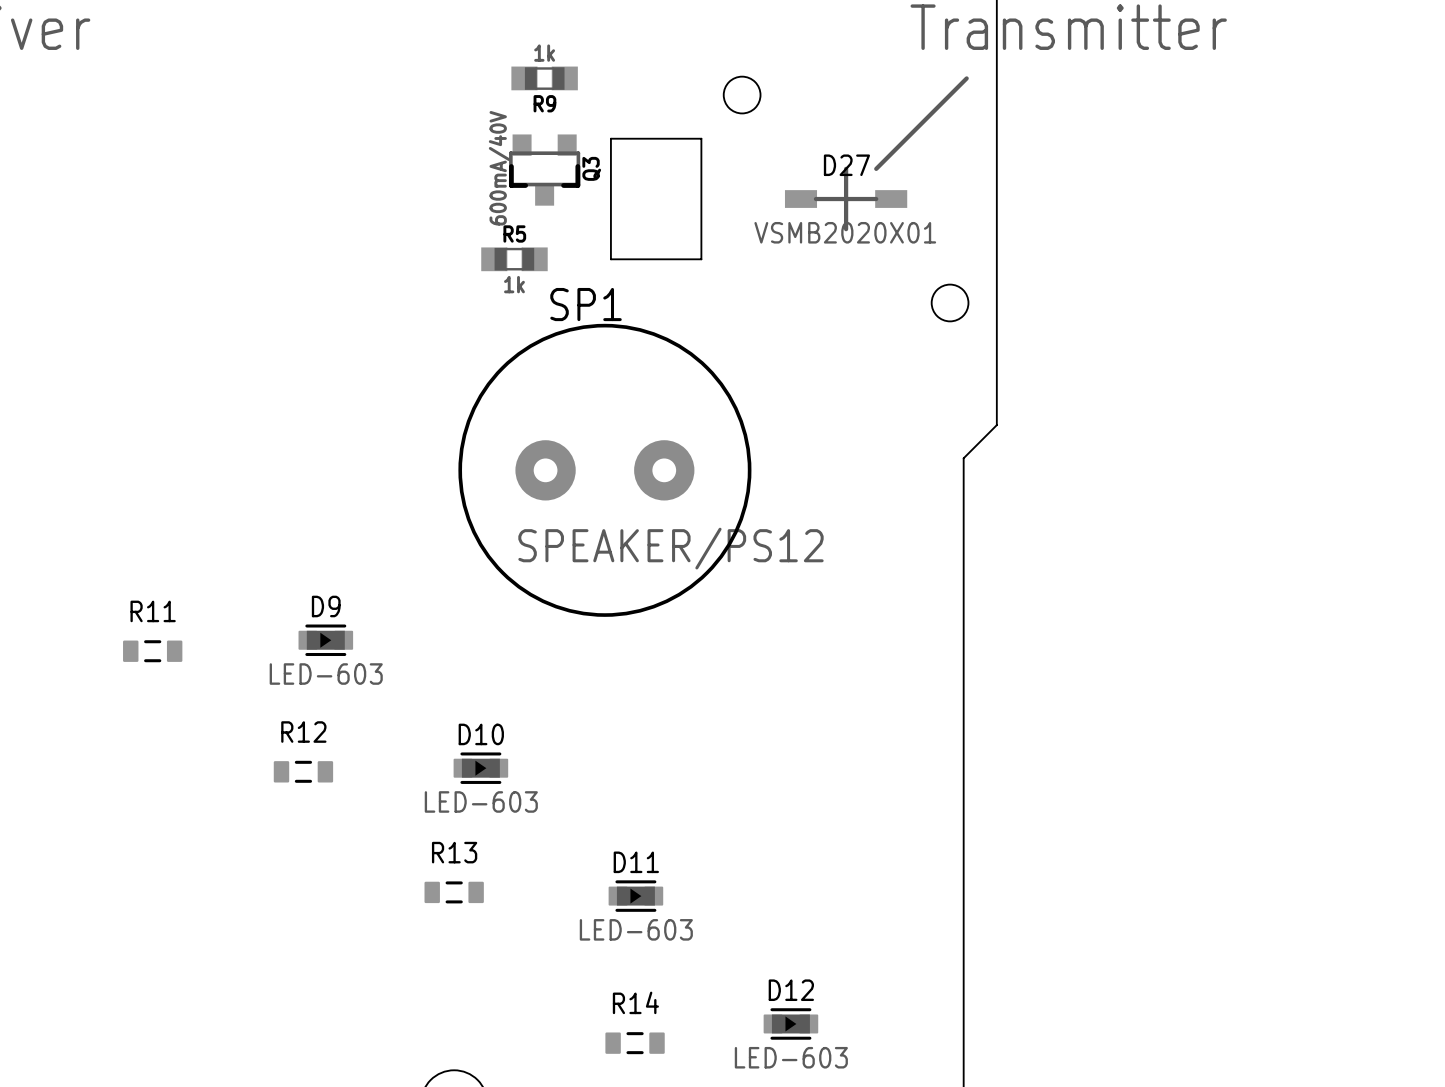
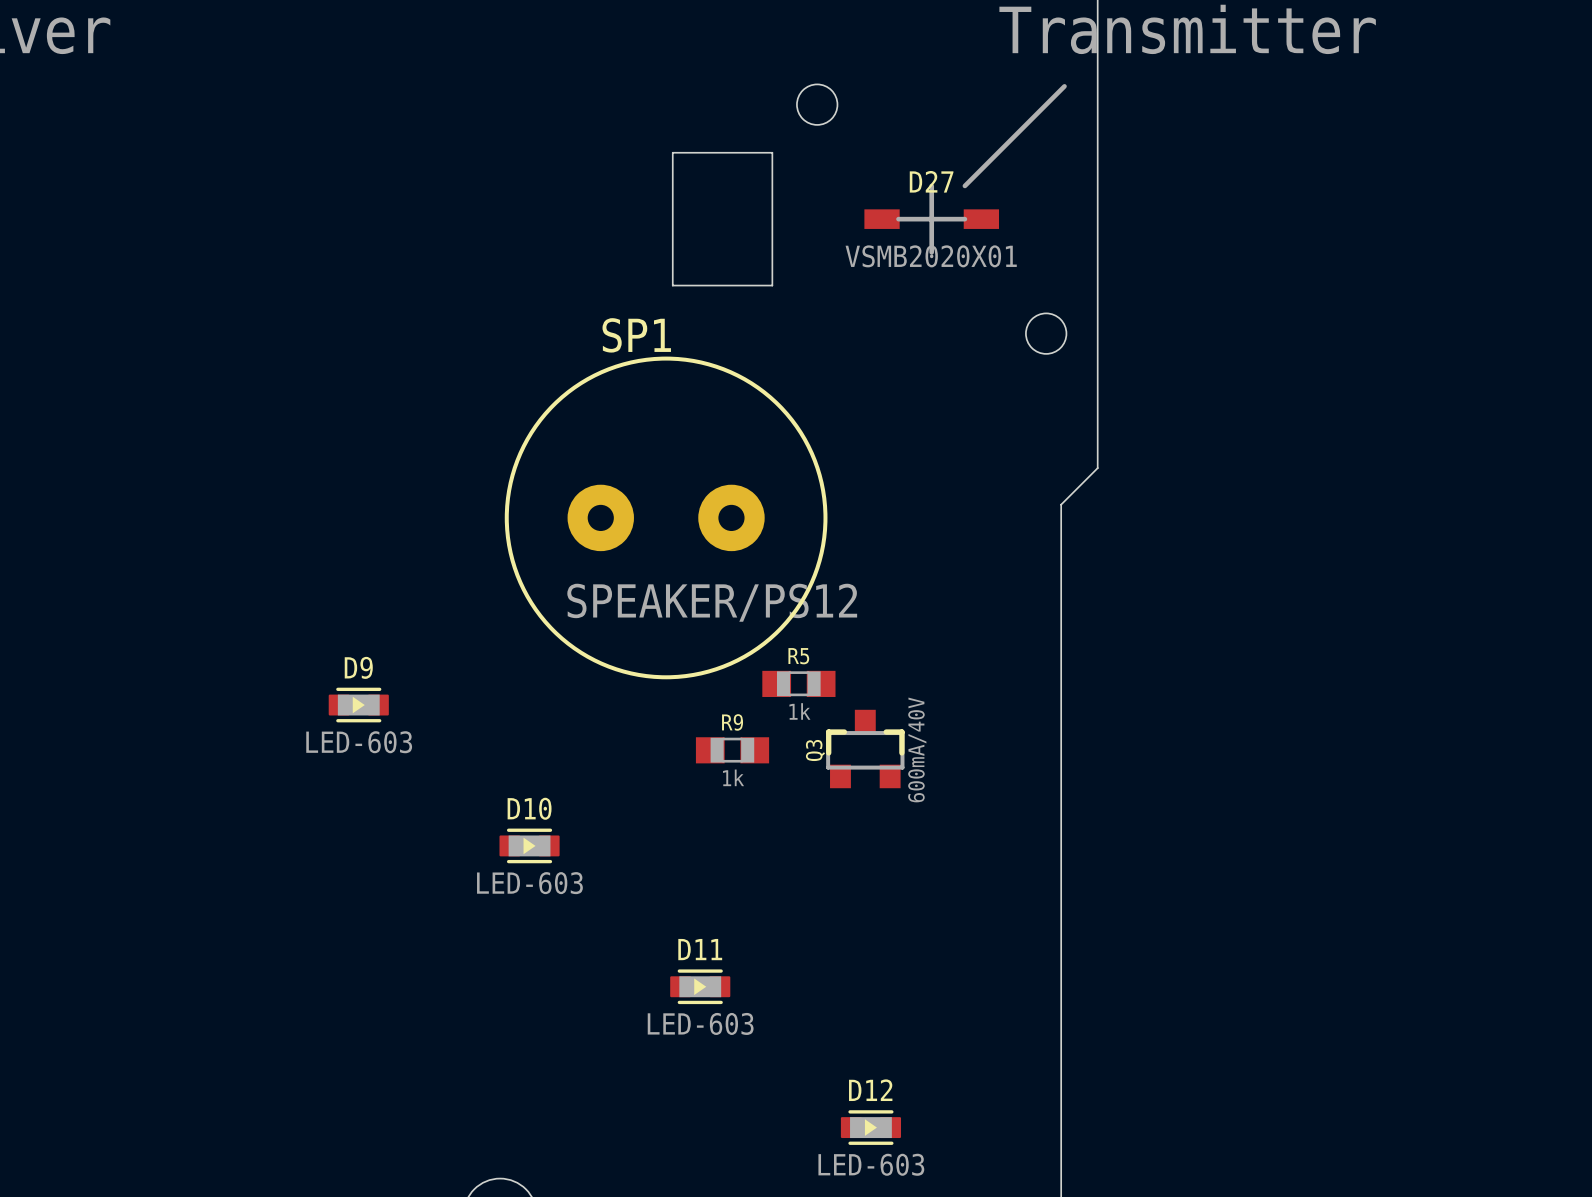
R9 value position: 1k (544, 53) -> 1k (733, 777)
R9 position: (544, 78) -> (732, 750)
R9 name position: R9 (544, 103) -> R9 (732, 722)
Q3 rotation: 0° (544, 170) -> 180° (865, 749)
Q3 position: (544, 170) -> (865, 749)
R5 position: (514, 259) -> (798, 683)
R11: (152, 651) -> none
R12: (303, 771) -> none
R13: (454, 892) -> none
R14: (635, 1043) -> none

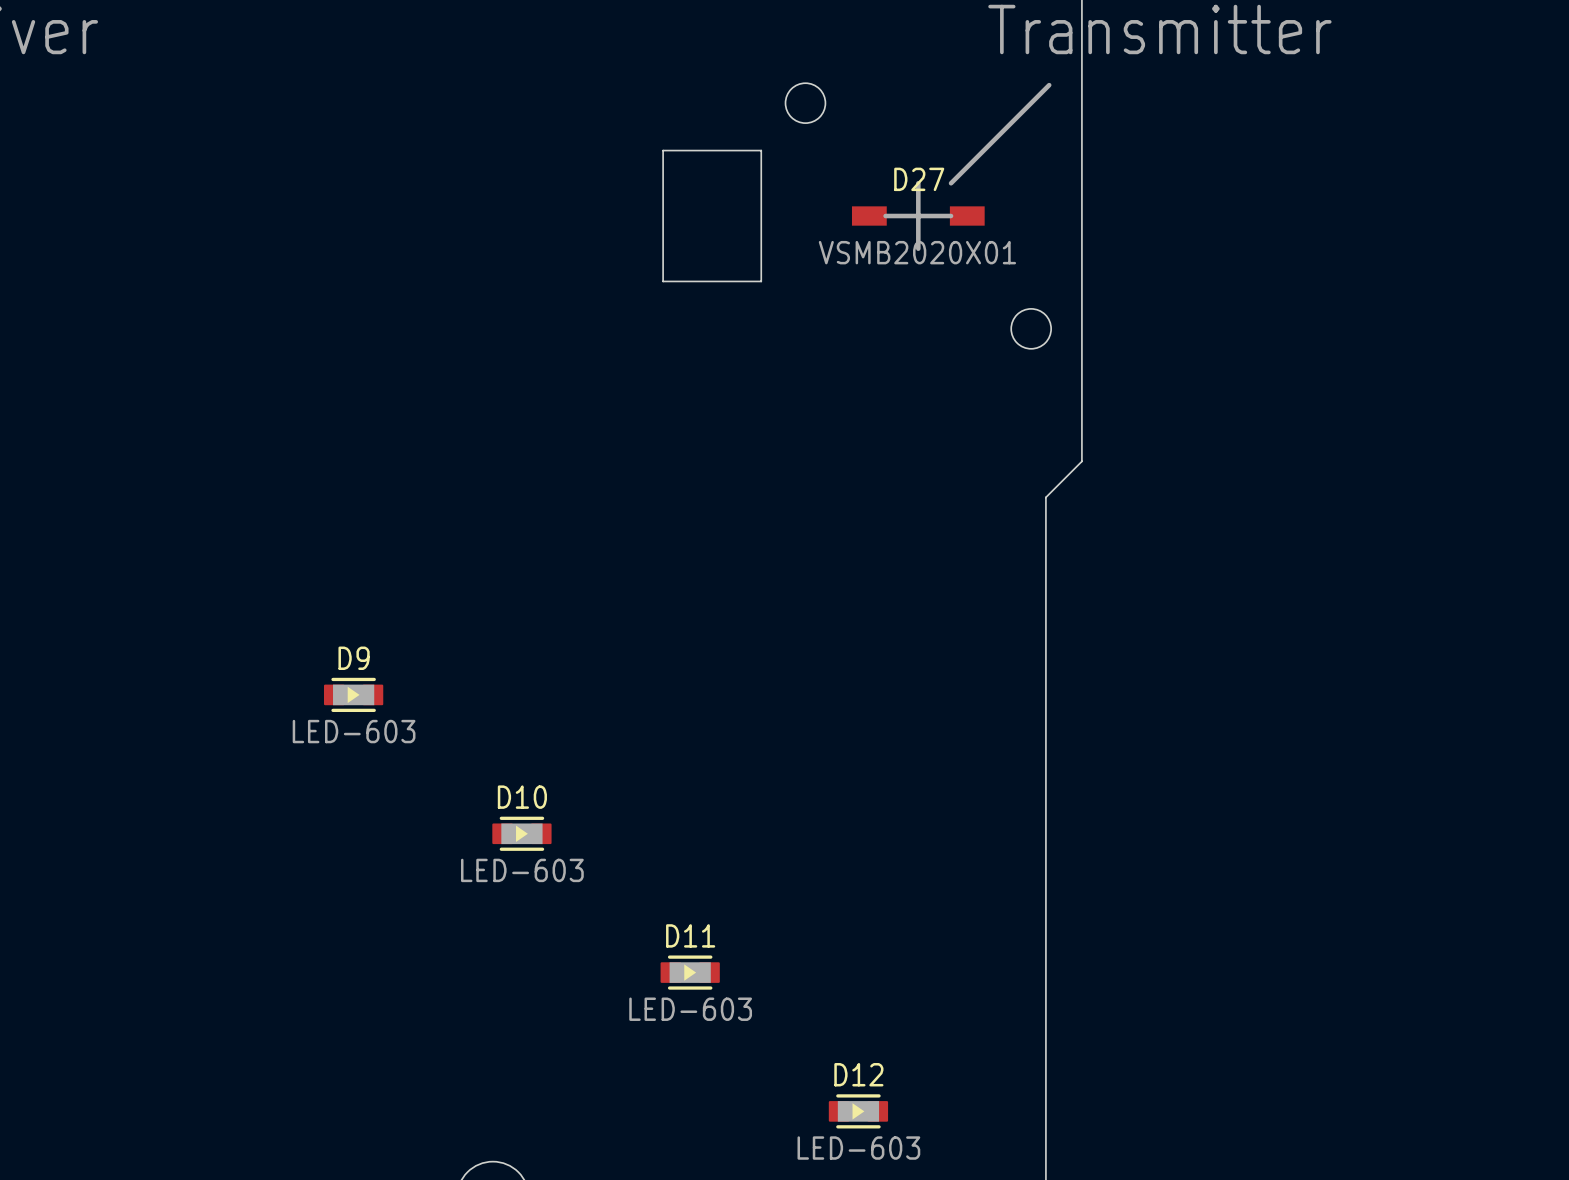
SP1: SPEAKER/PS12 (666, 517) -> none
R5: 1k (798, 683) -> none
Q3: 600mA/40V (865, 749) -> none
R9: 1k (732, 750) -> none

